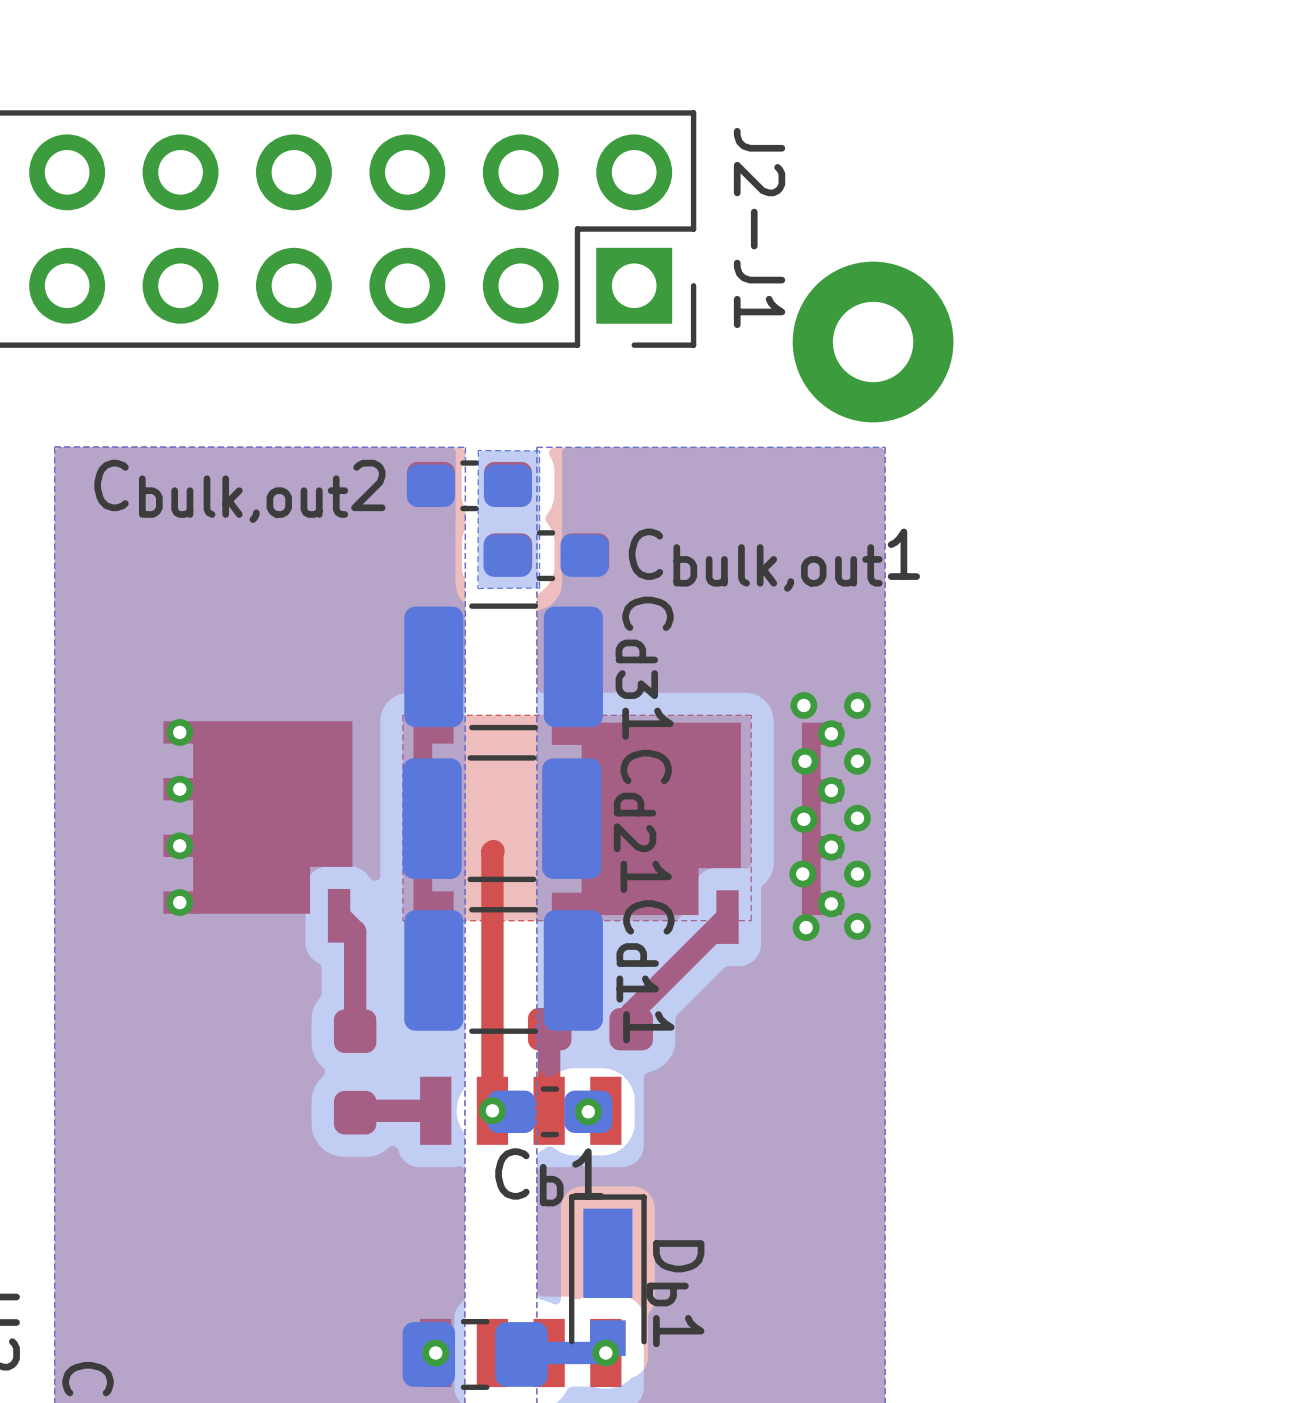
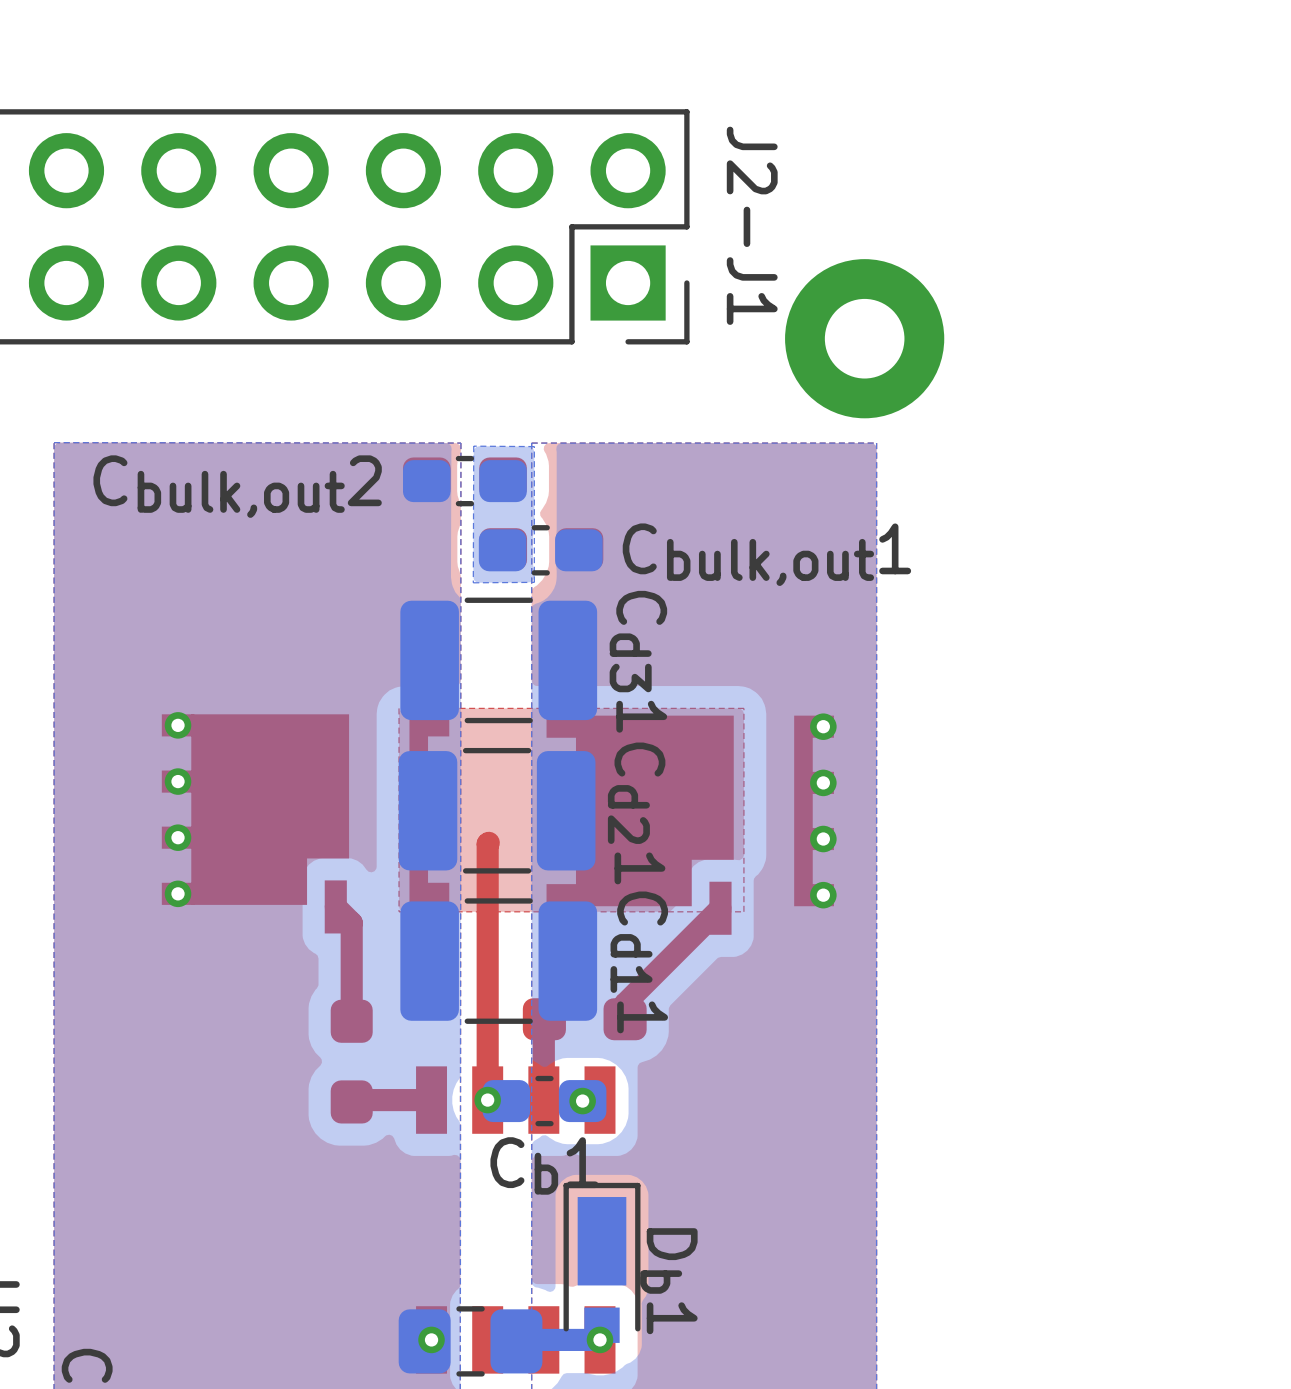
via: (803, 705) -> none
via: (857, 705) -> none
via: (804, 761) -> none
via: (857, 761) -> none
via: (857, 818) -> none
via: (803, 819) -> none
via: (802, 874) -> none
via: (857, 874) -> none
via: (857, 926) -> none
via: (806, 927) -> none

